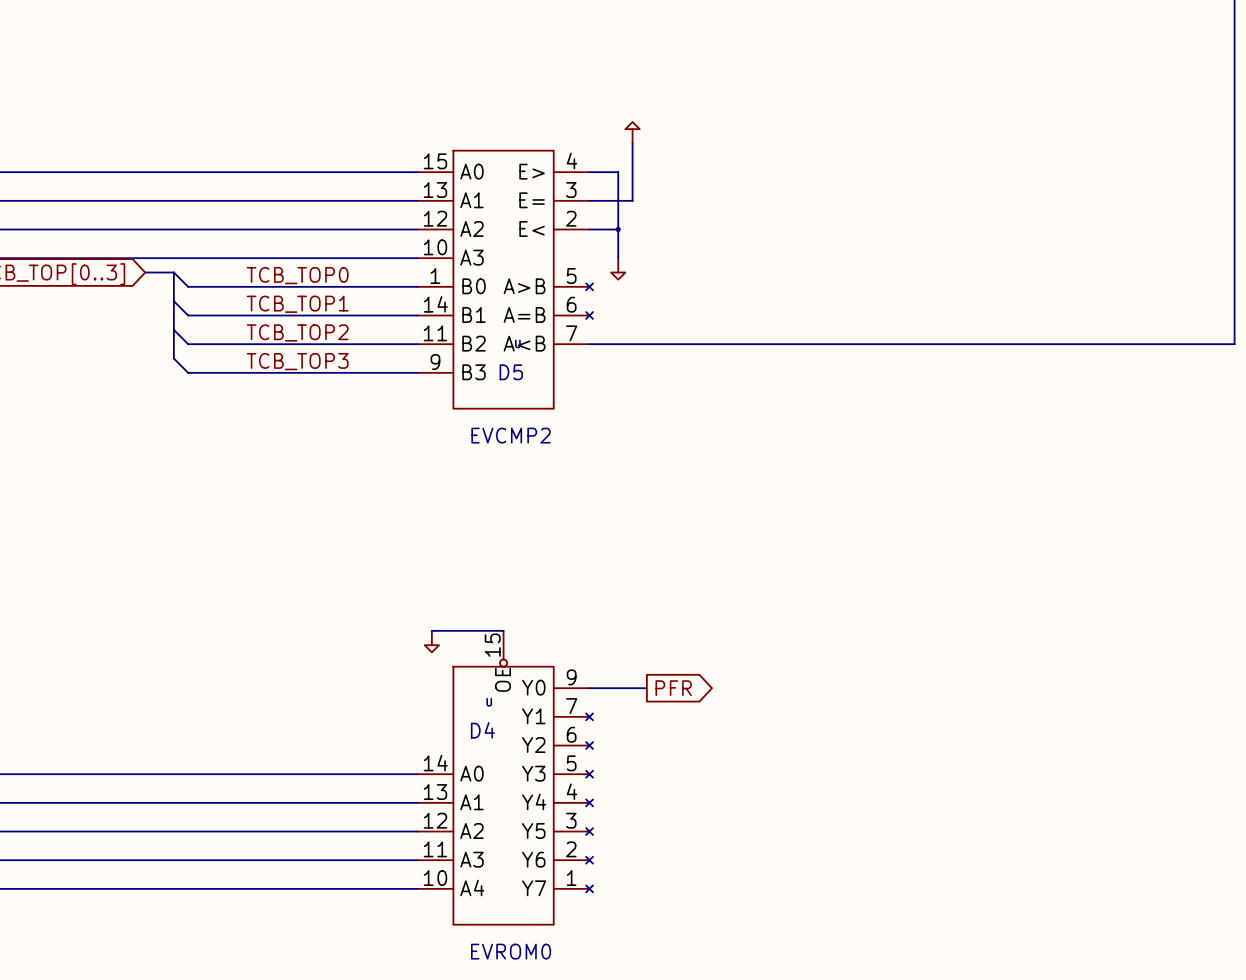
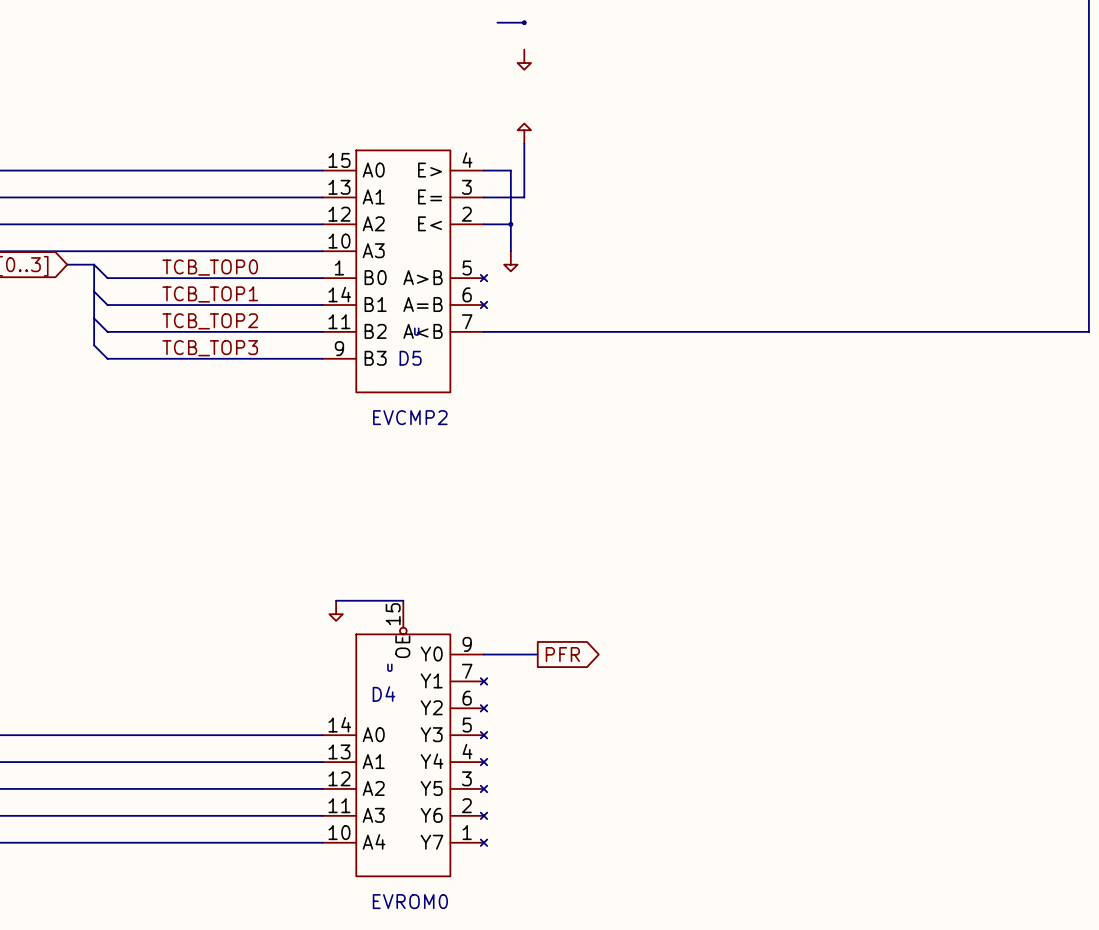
wire: none -> (497, 22) (524, 22)
junction: none -> (524, 22)
power symbol: none -> (524, 59)

